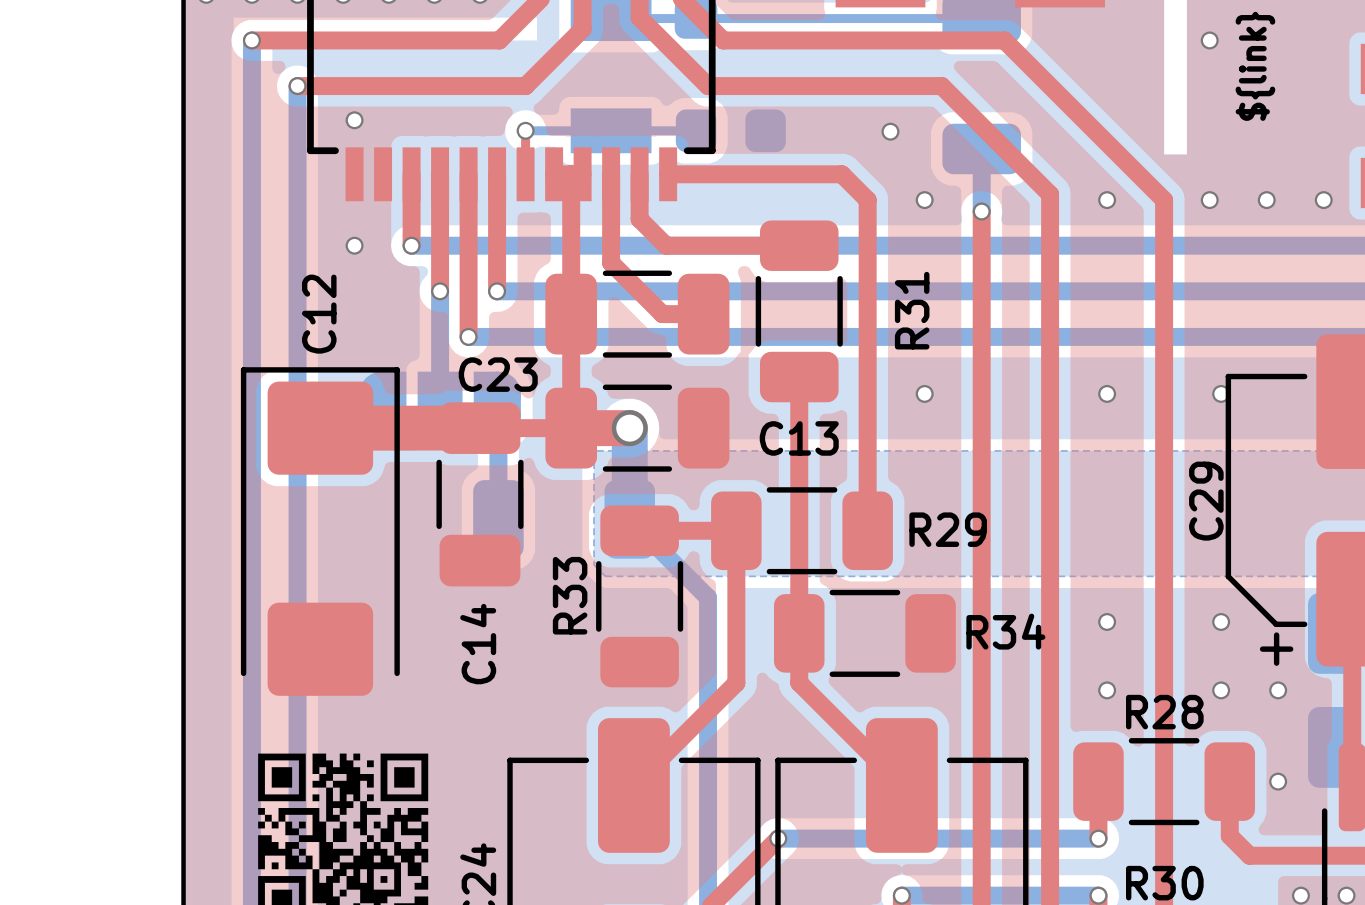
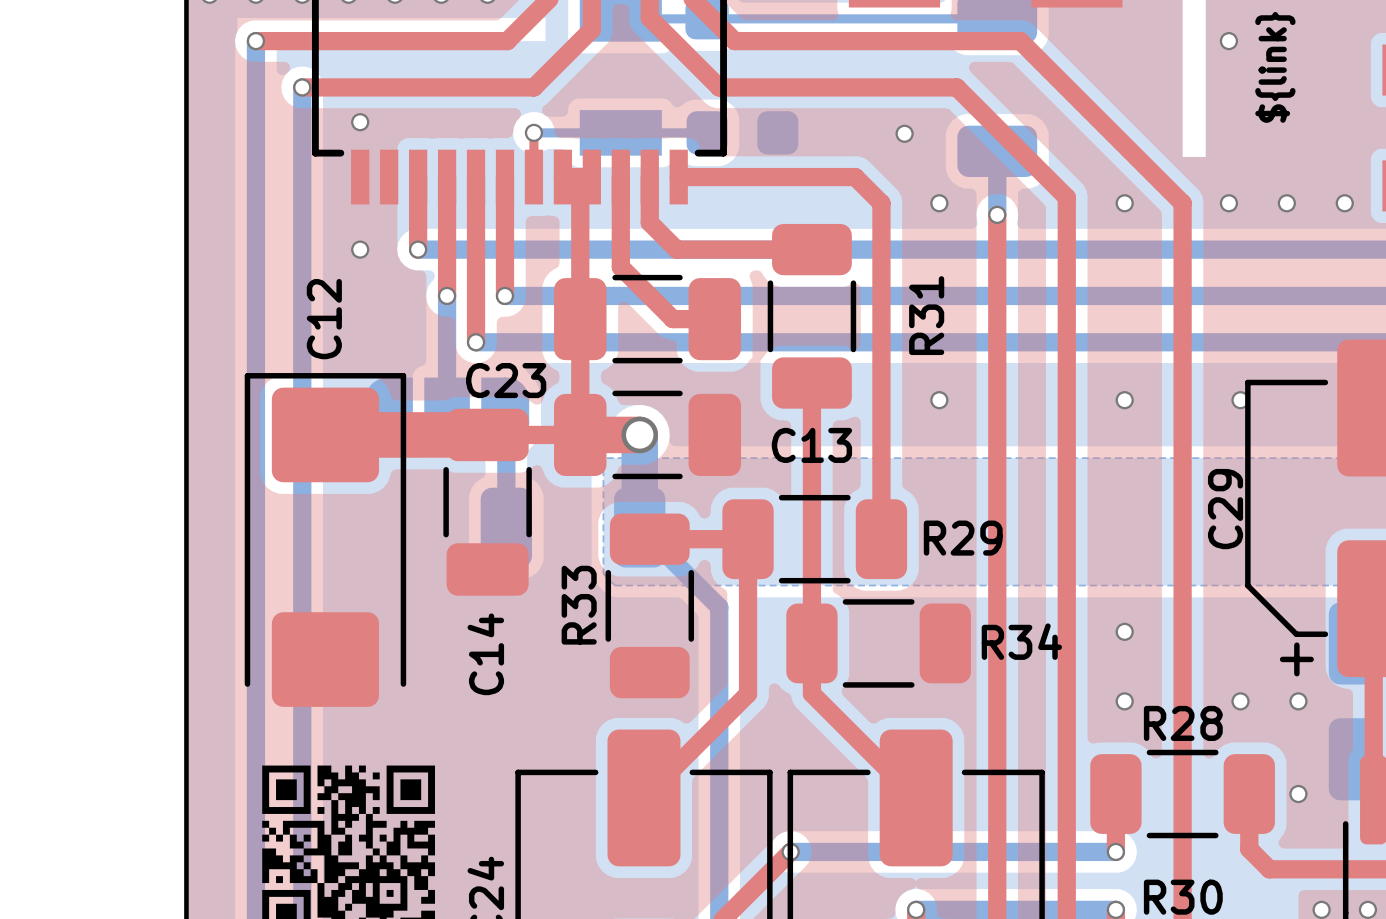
via: (1221, 621) -> none

